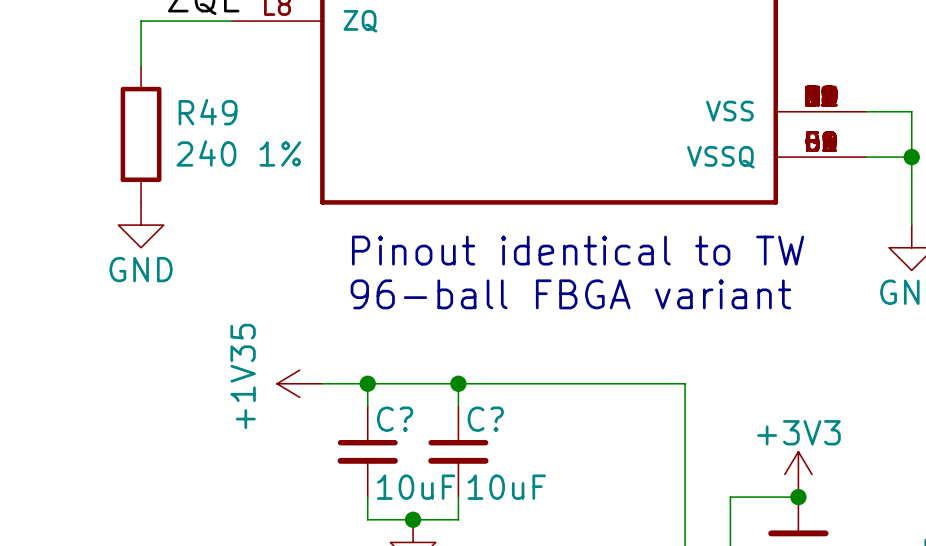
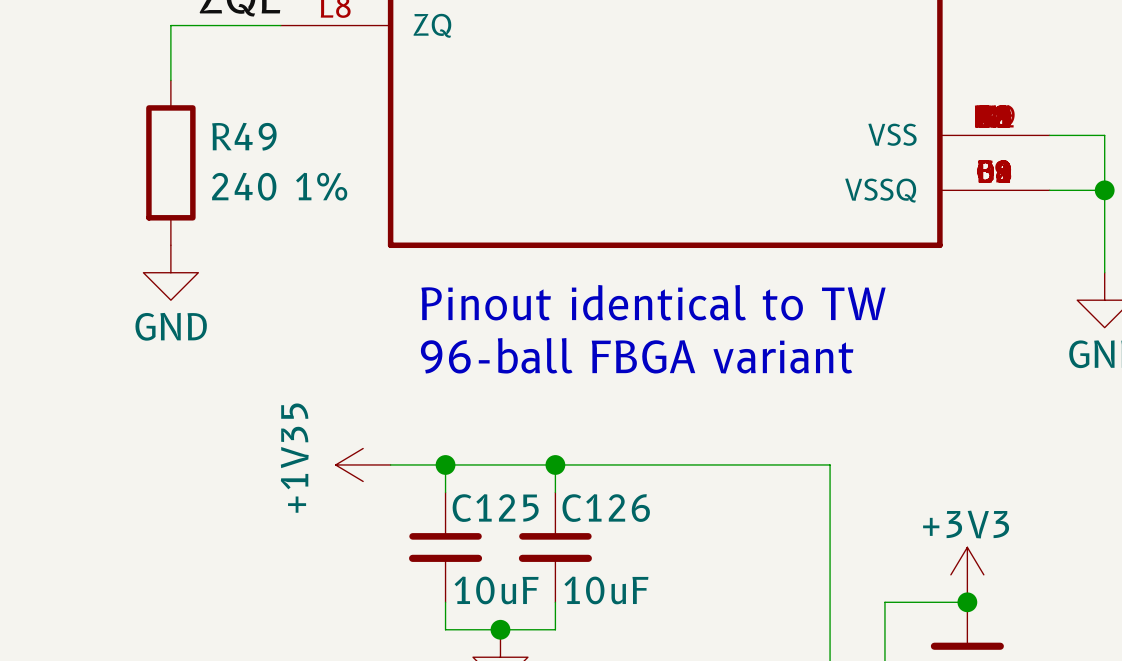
C? name: C? (395, 419) -> C125 (495, 508)
C? name: C? (485, 419) -> C126 (606, 508)

